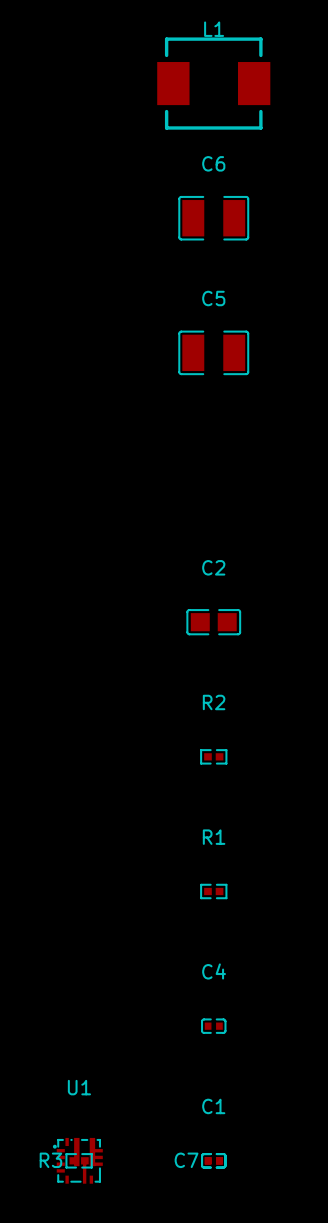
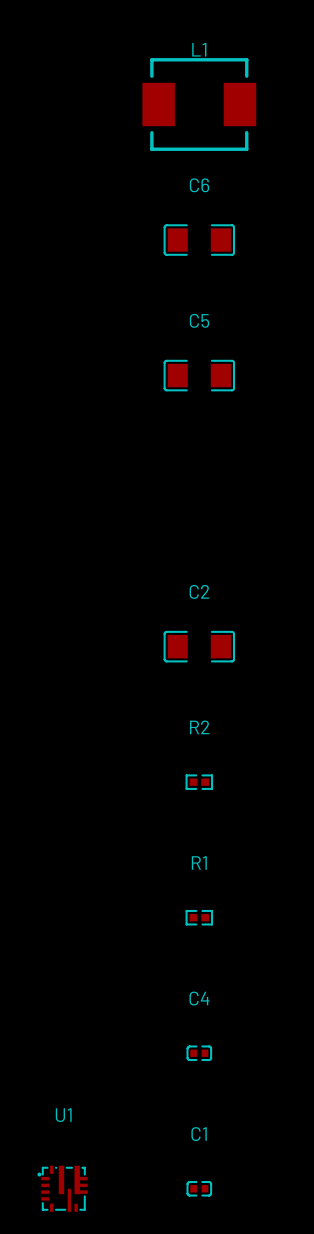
C6 footprint: [178, 195, 250, 241] -> [163, 224, 236, 256]
C5 footprint: [178, 330, 250, 376] -> [163, 359, 236, 392]
C2 footprint: [186, 609, 242, 636] -> [163, 630, 236, 663]
R3: (79, 1160) -> none
C7: (213, 1160) -> none

